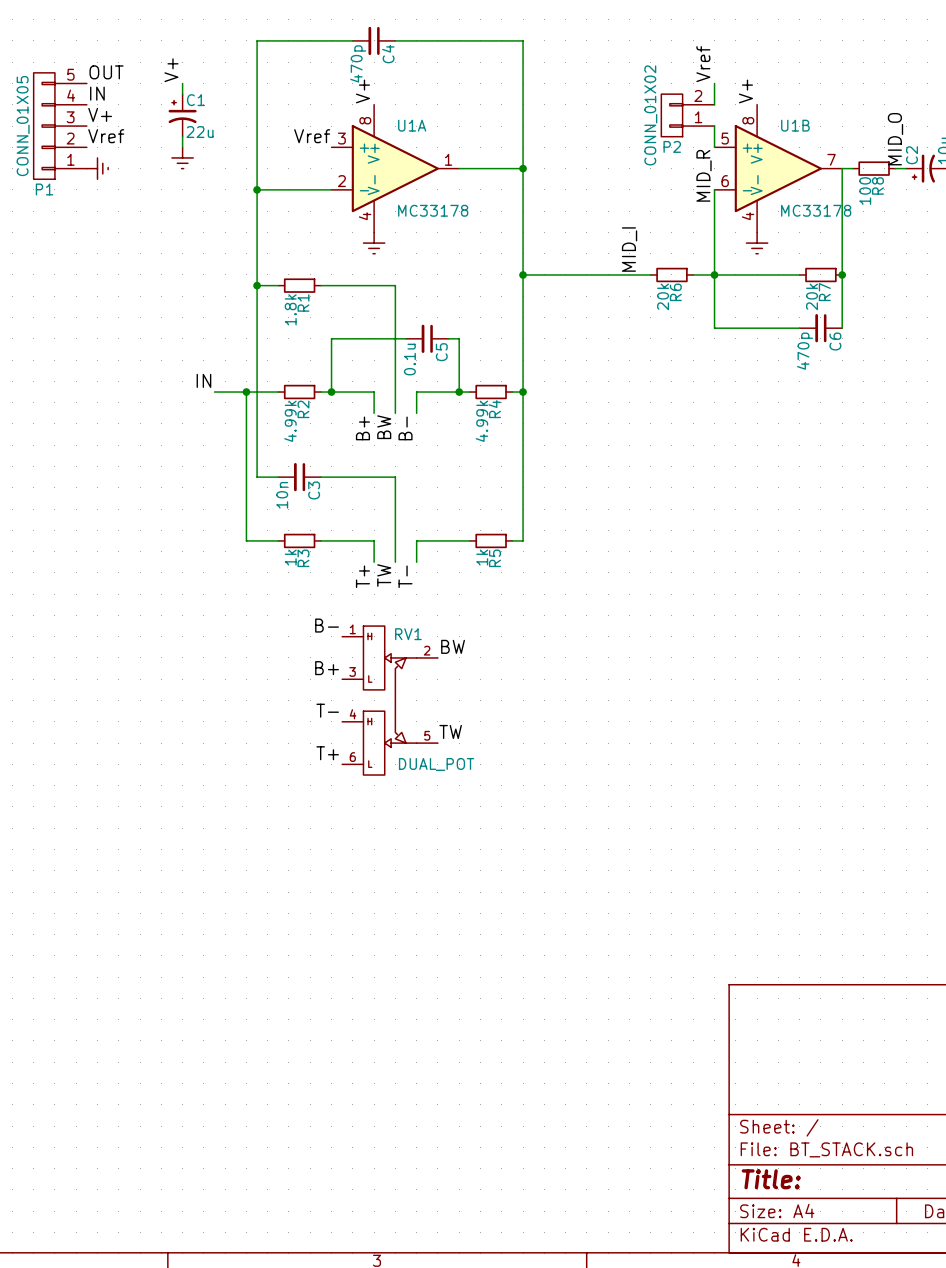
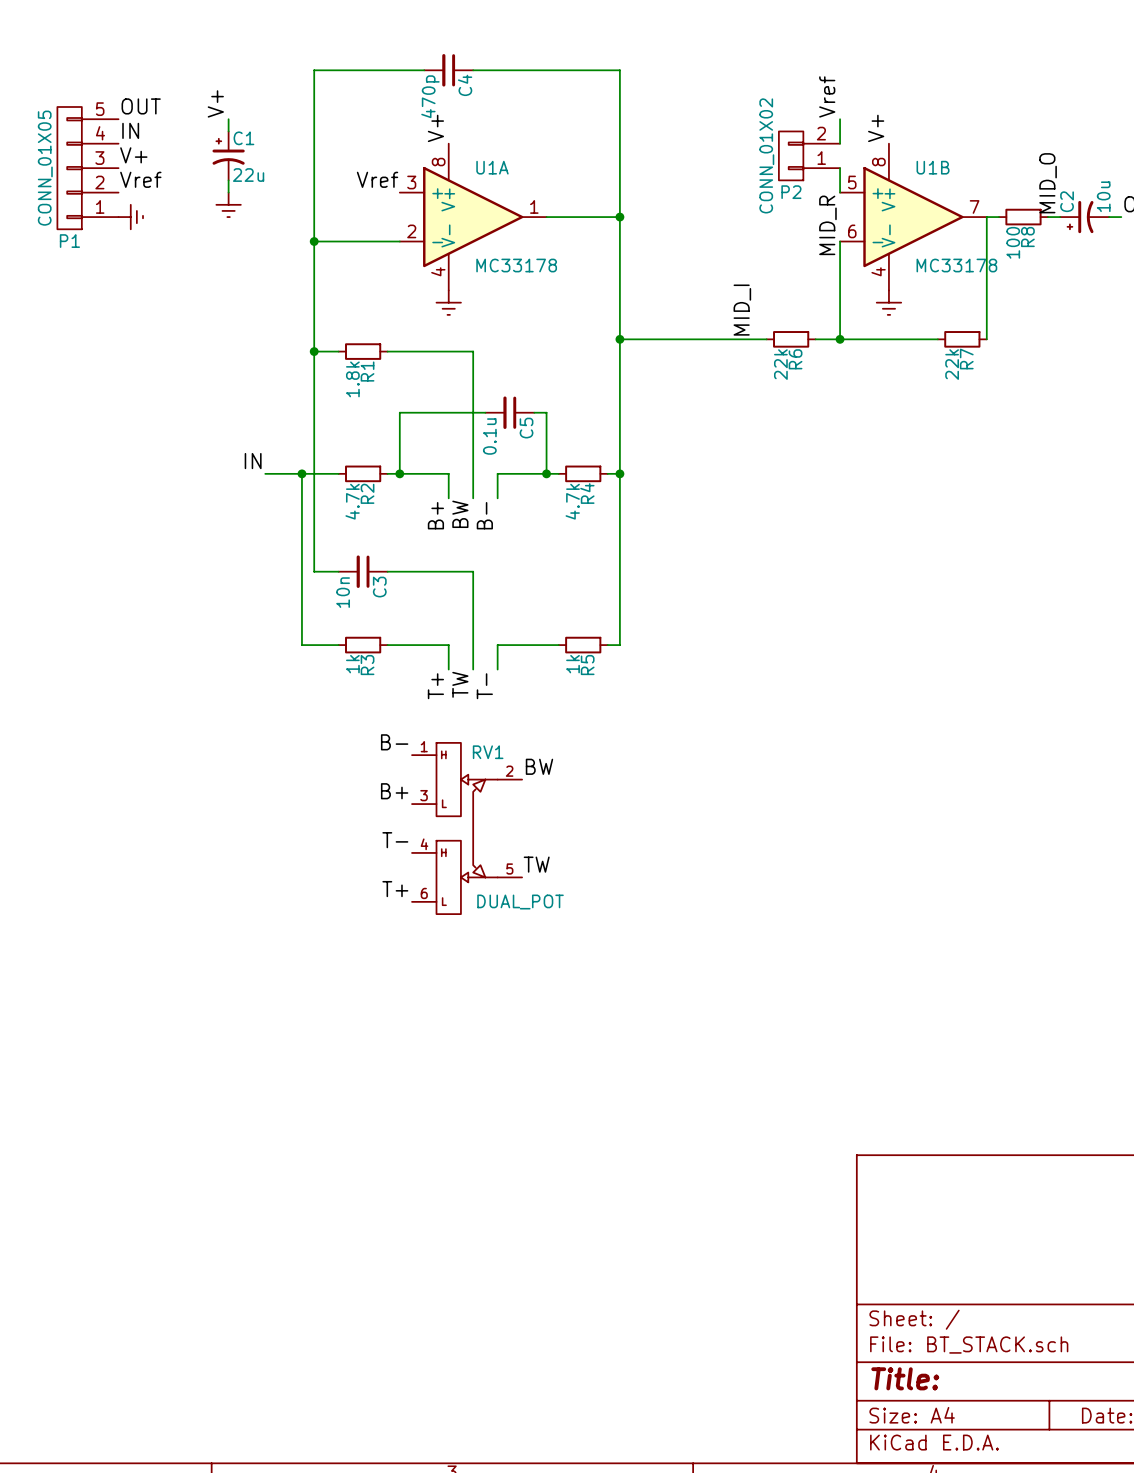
wire: (714, 274) (714, 328) (799, 328) -> none
wire: (842, 274) (842, 328) -> none
junction: (842, 274) -> none
R6 value: 20k (663, 296) -> 22k (780, 364)
R7 value: 20k (812, 296) -> 22k (952, 364)
C6: 470p (820, 328) -> none
R2 value: 4.99k (290, 421) -> 4.7k (352, 501)
R4 value: 4.99k (481, 421) -> 4.7k (572, 501)

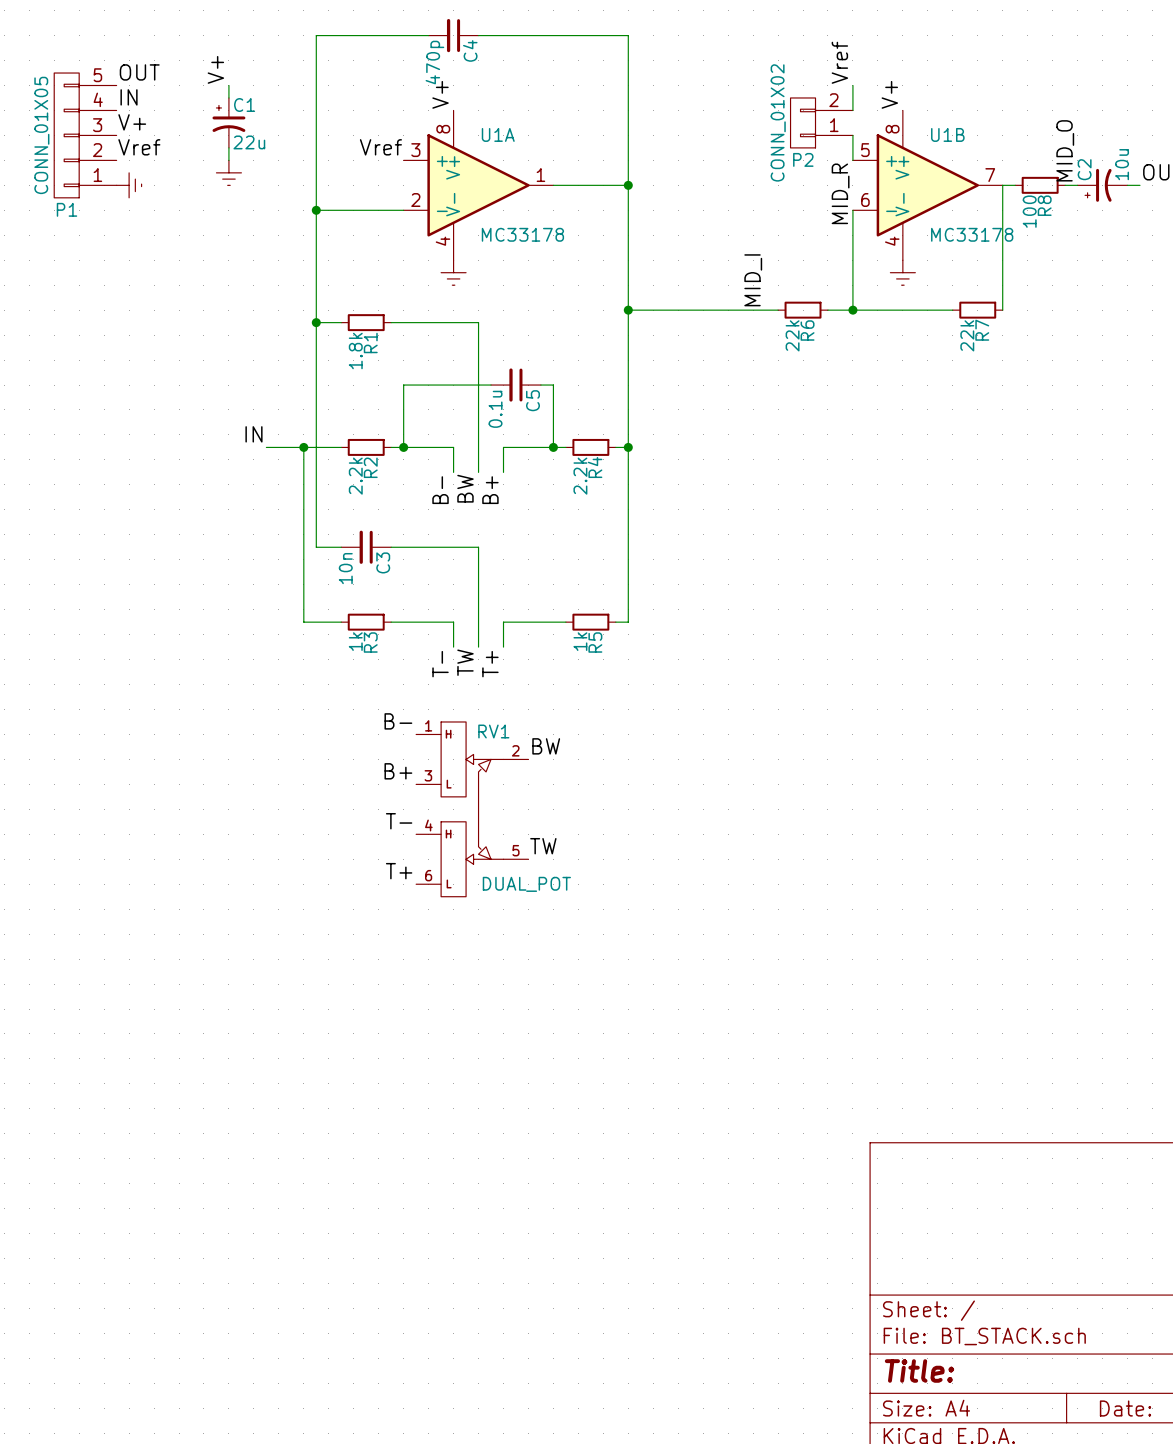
R2 value: 4.7k (352, 501) -> 2.2k (355, 476)
R4 value: 4.7k (572, 501) -> 2.2k (580, 476)
label: B+ (435, 515) -> B- (440, 490)
label: B- (484, 515) -> B+ (490, 490)
label: T+ (435, 686) -> T- (440, 664)
label: T- (484, 686) -> T+ (490, 664)

